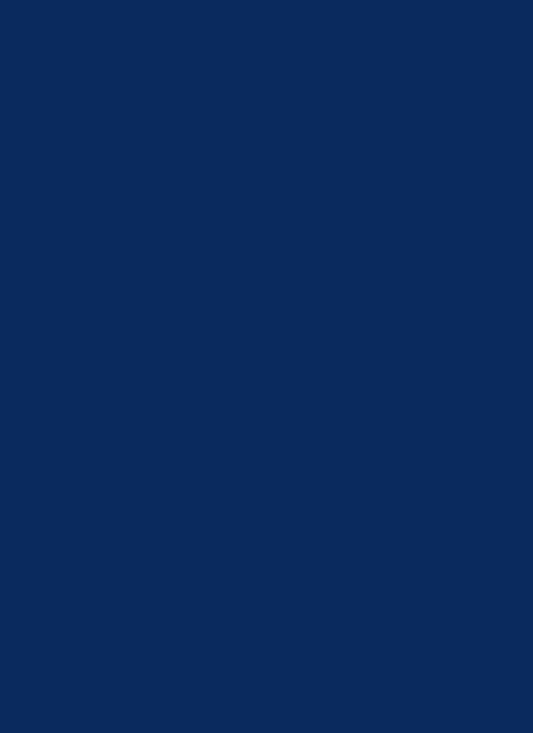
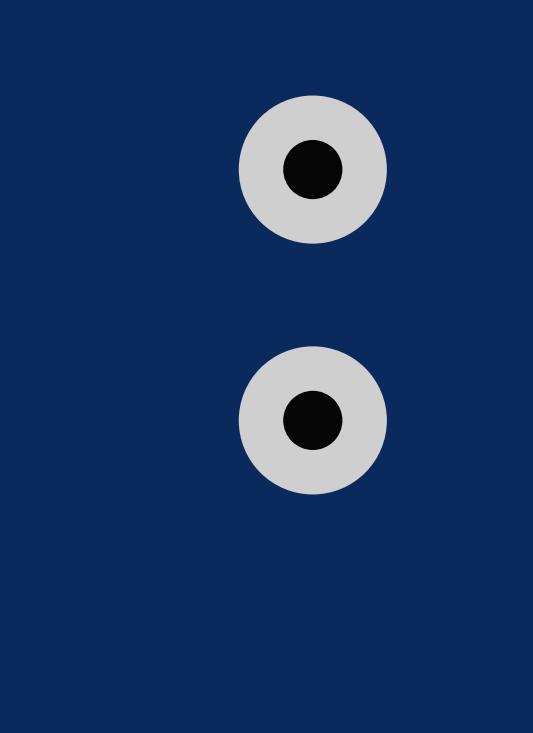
part: none -> (312, 294)

